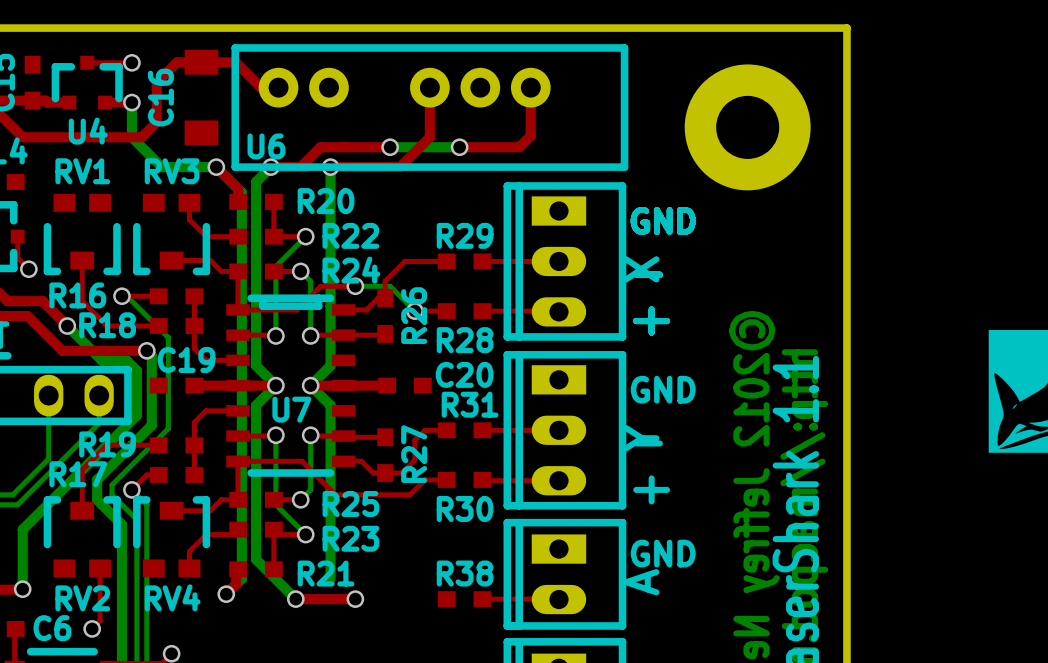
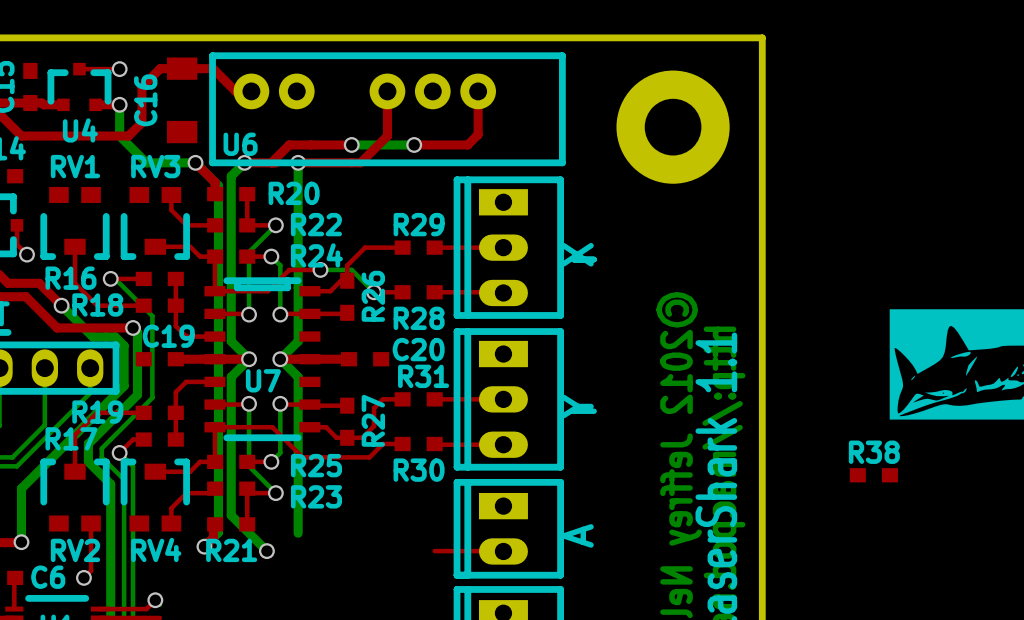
text: GND (663, 220) -> none
text: + (651, 321) -> none
text: GND (663, 389) -> none
text: + (651, 489) -> none
text: GND (663, 553) -> none
R21 name position: R21 (326, 573) -> R21 (231, 550)
top track: (295, 599) (355, 599) -> none
via: (355, 599) -> none
R38 position: (464, 599) -> (873, 475)

